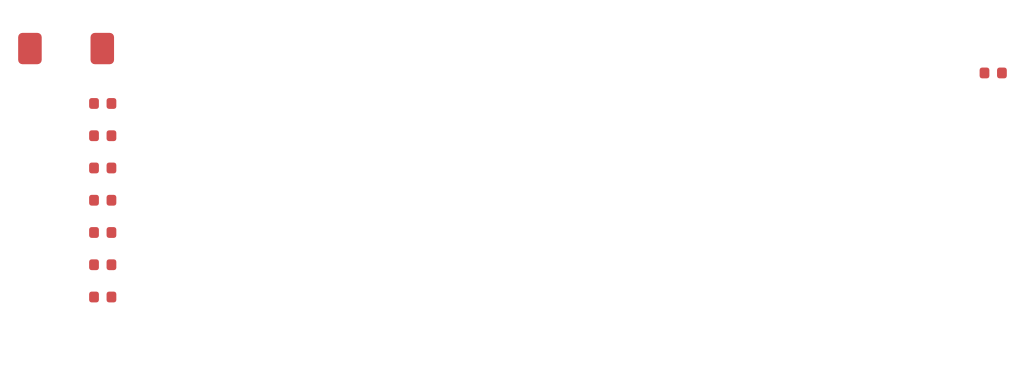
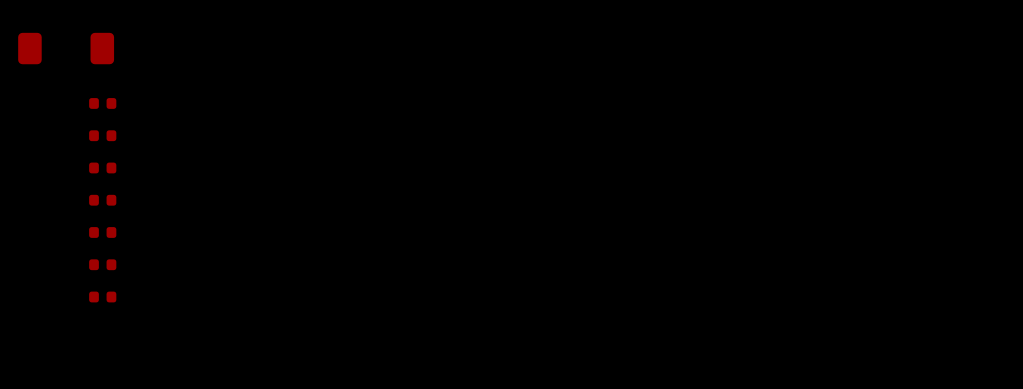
part: (993, 72) -> none

